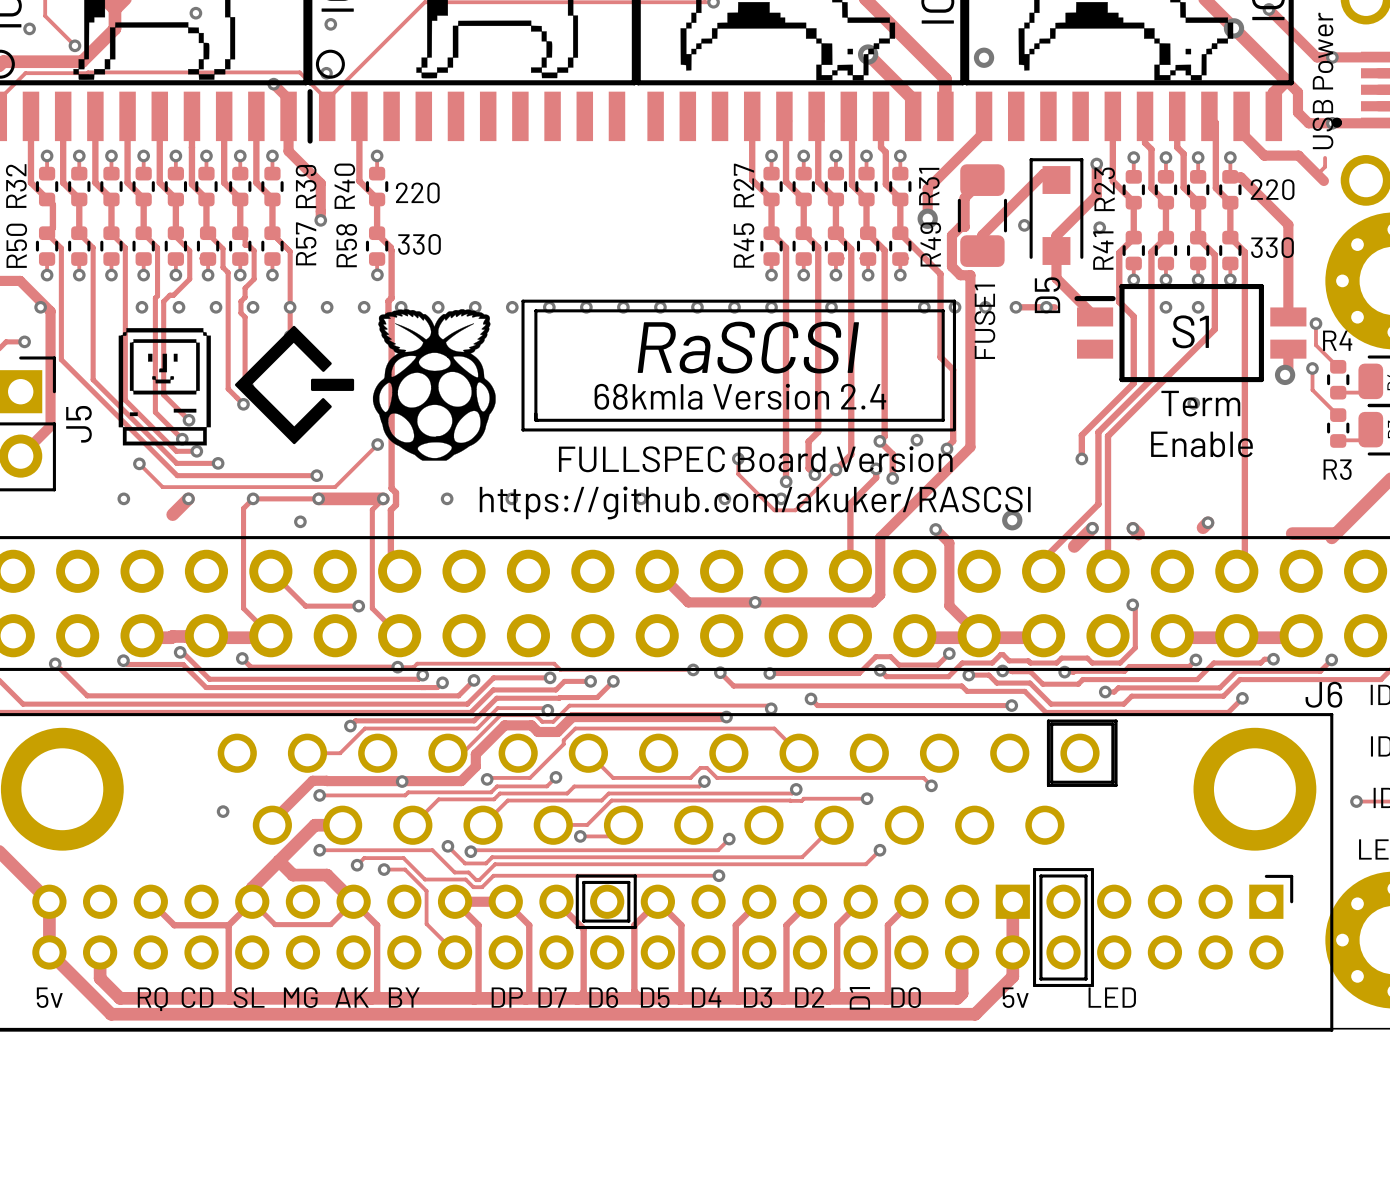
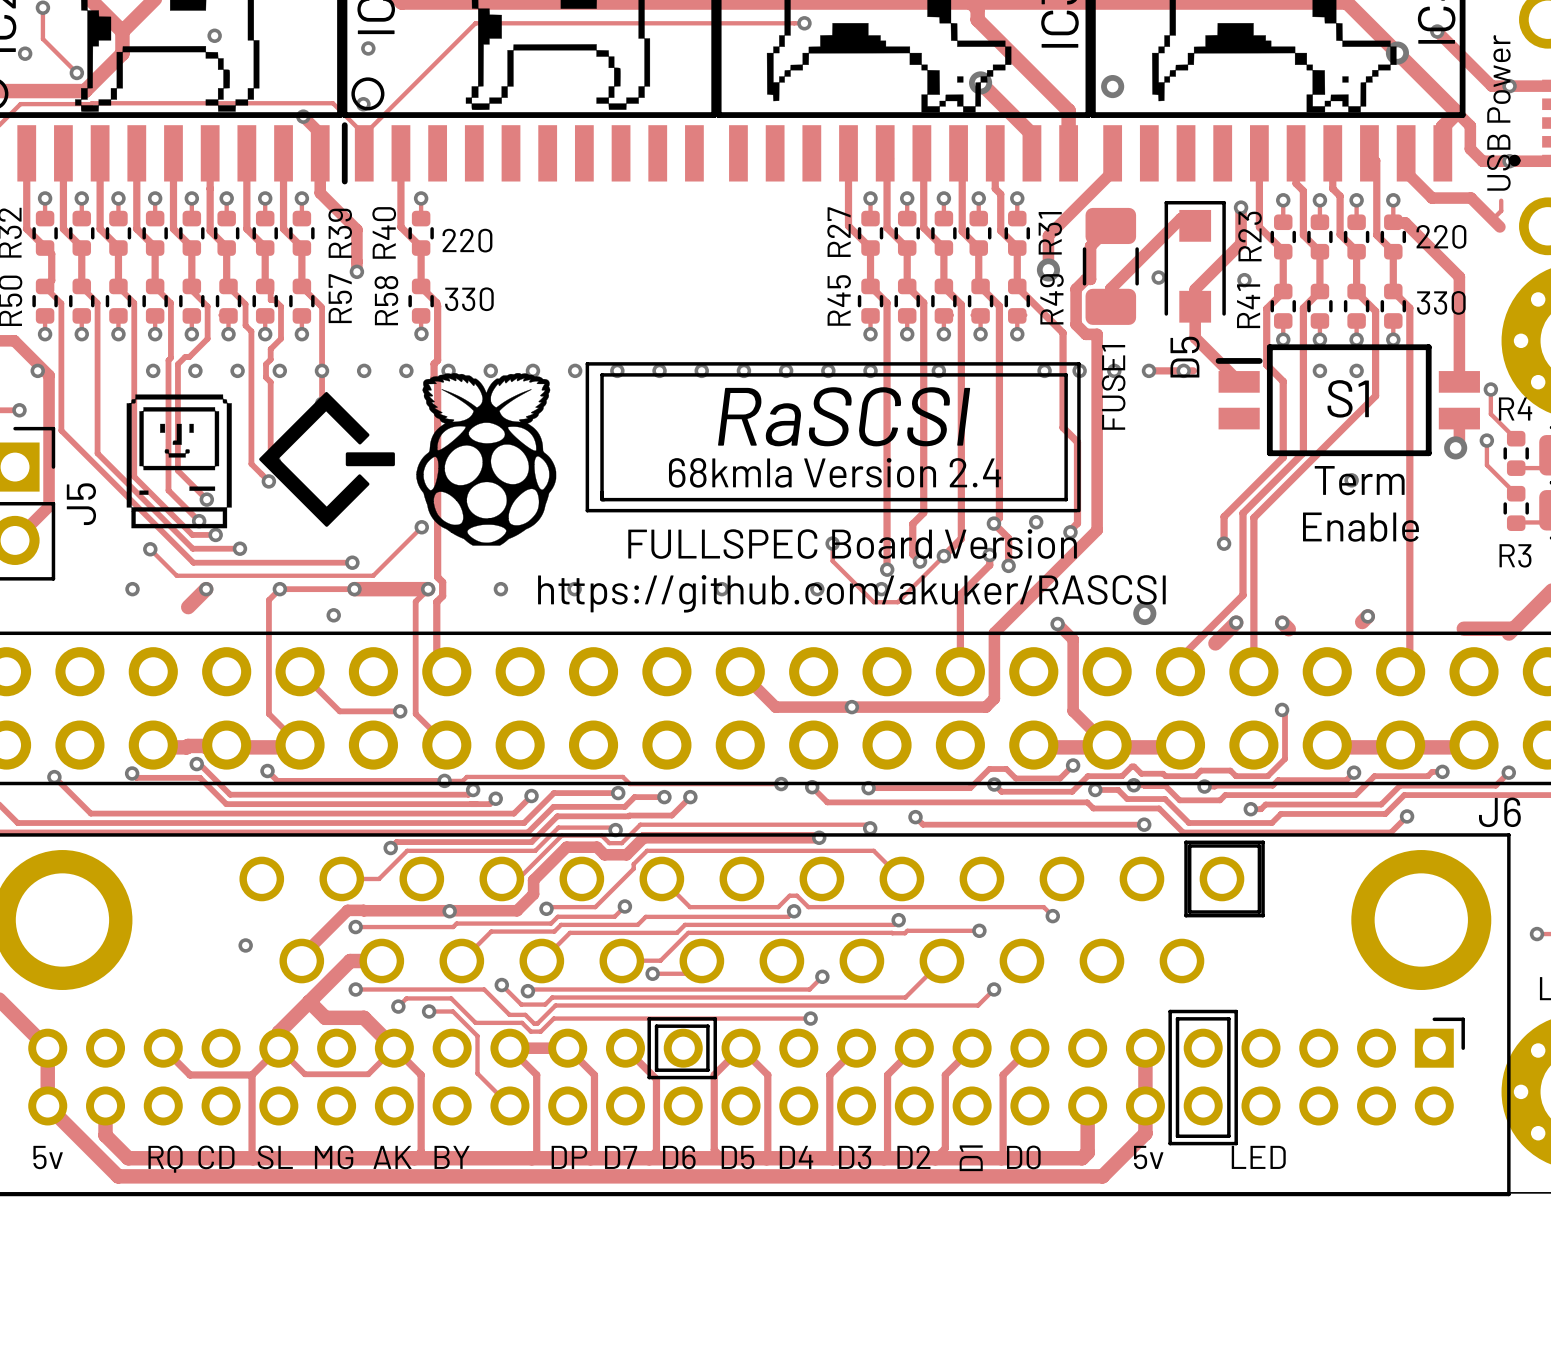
part footprint: [32, 874, 1294, 970] -> [28, 1017, 1465, 1126]

